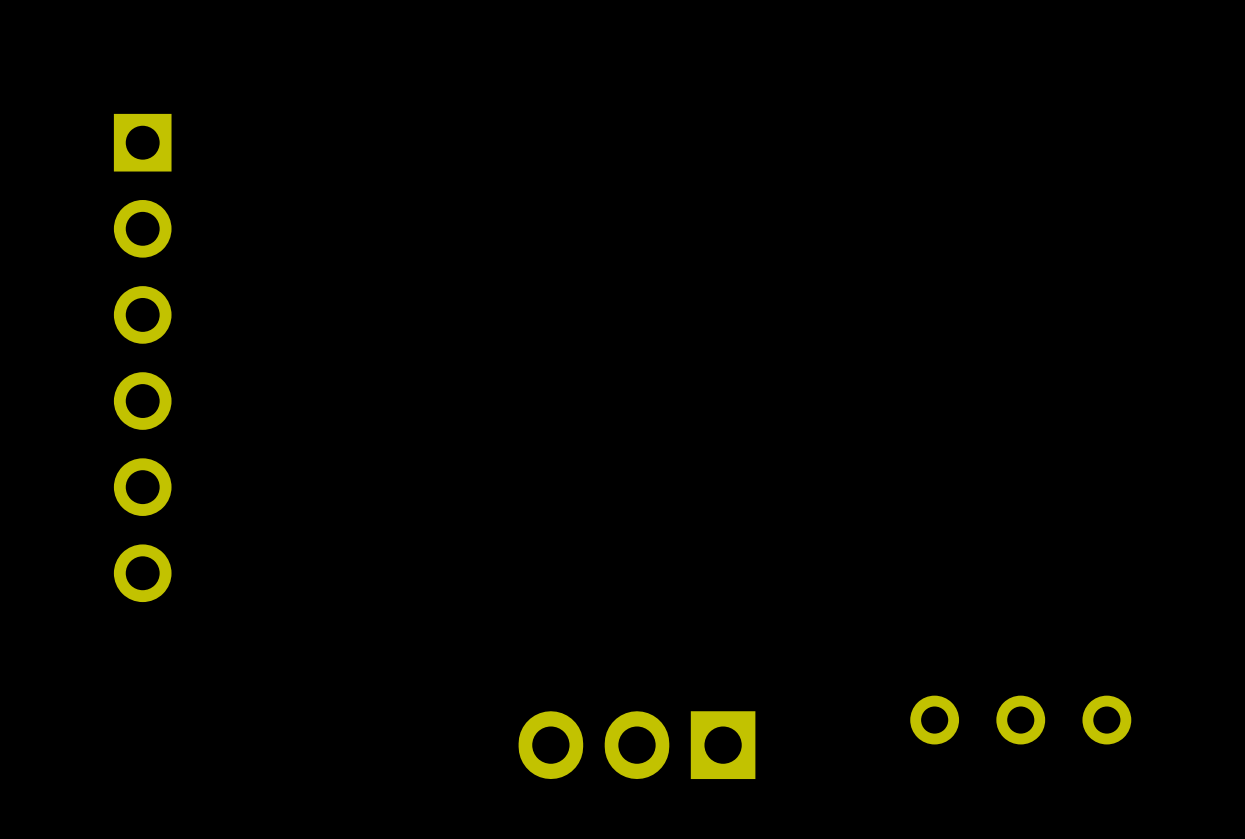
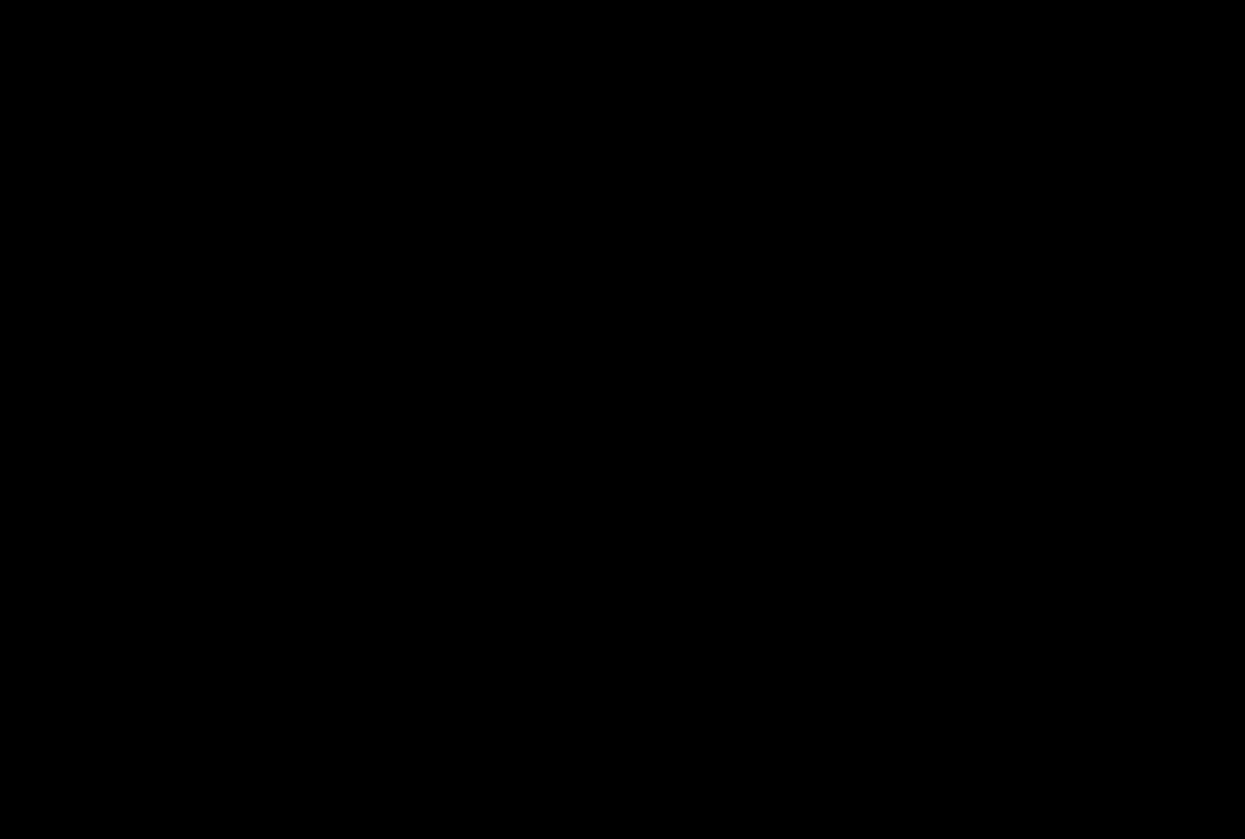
part: (142, 357) -> none
part: (1020, 720) -> none
part: (636, 745) -> none

